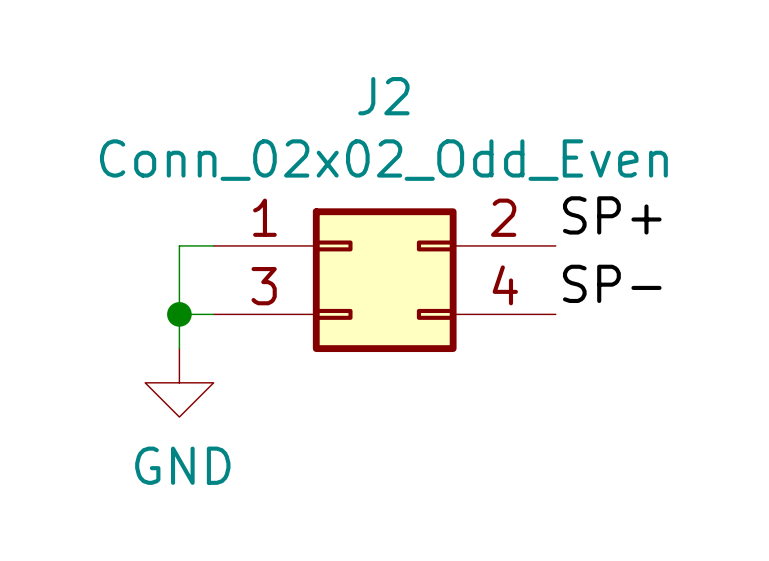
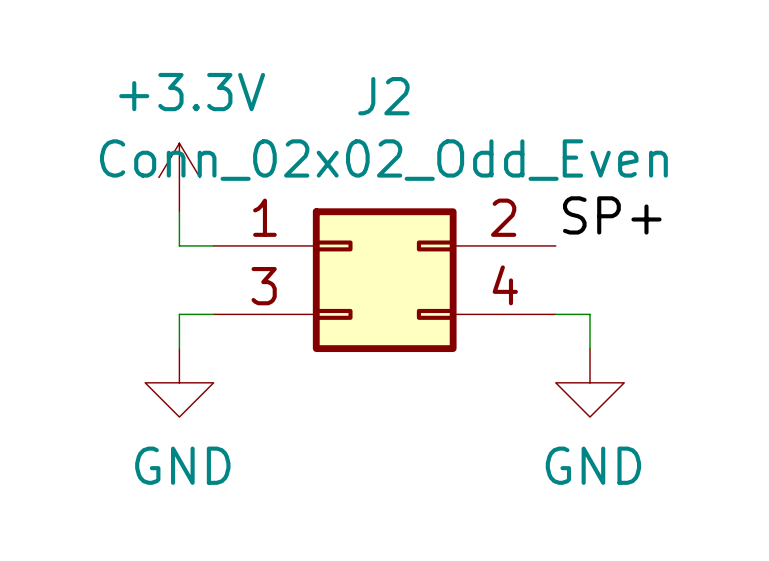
power symbol: none -> +3.3V (179, 177)
wire: (179, 245) (179, 314) -> (179, 245) (179, 211)
label: SP- (612, 283) -> none
junction: (179, 314) -> none
wire: none -> (555, 314) (590, 314) (590, 348)
power symbol: none -> GND (590, 382)

